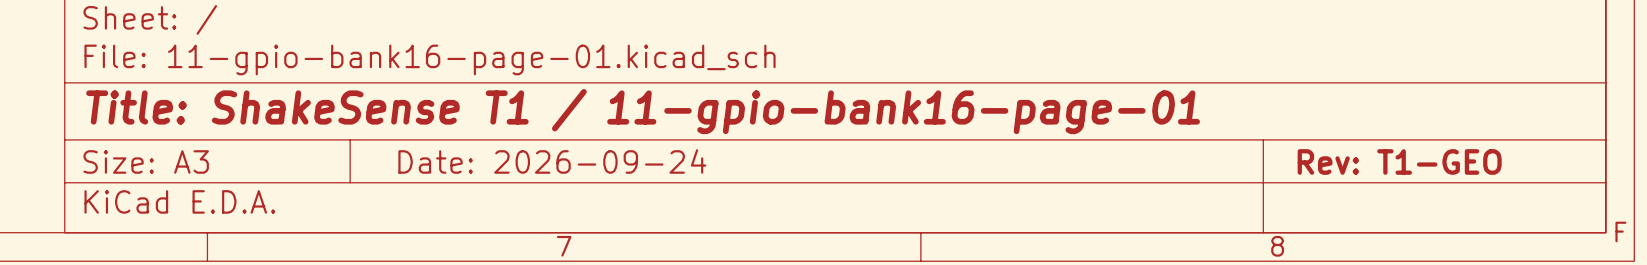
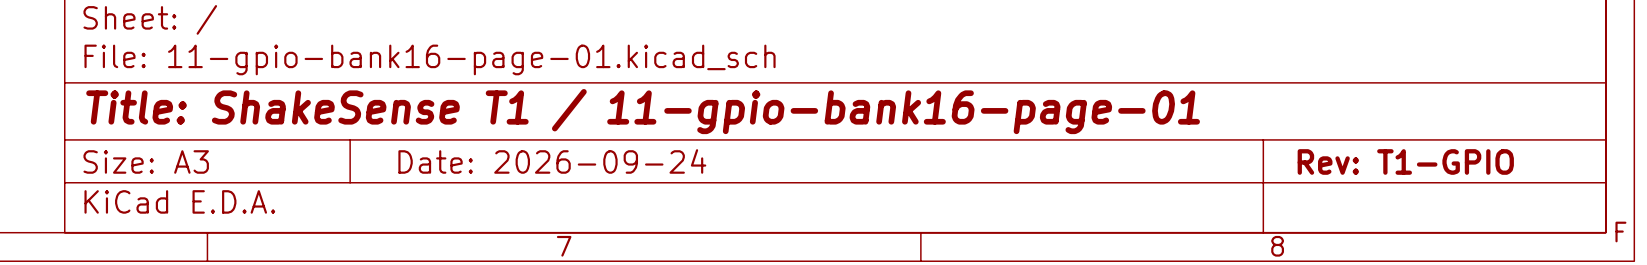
title block: Rev: T1-GEO (1399, 161) -> Rev: T1-GPIO (1405, 161)

